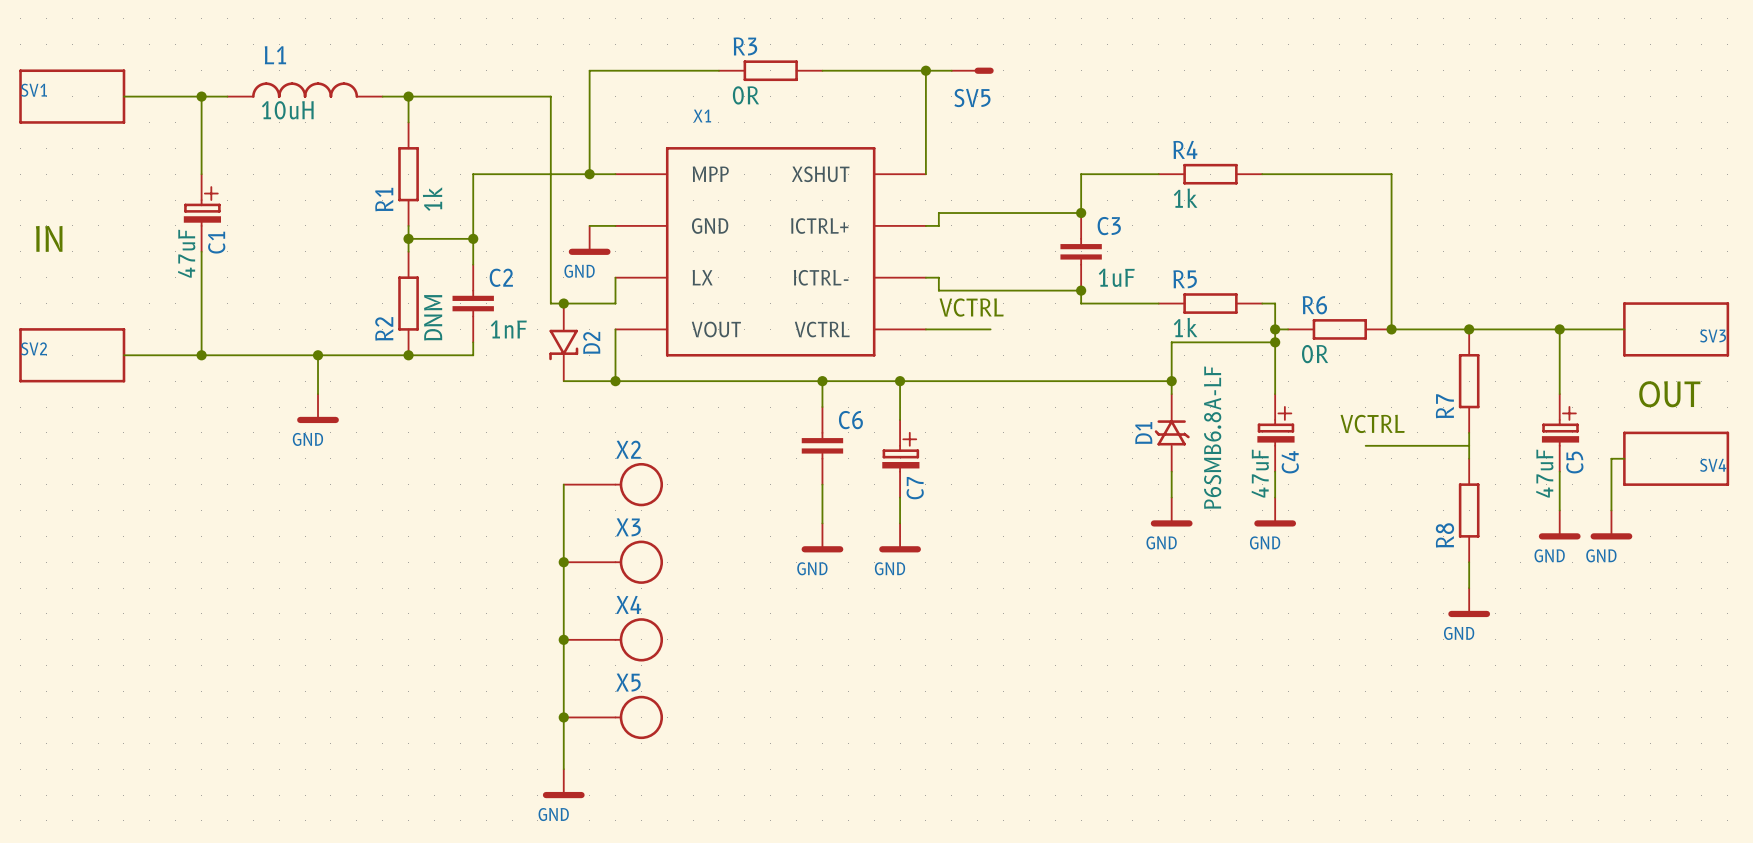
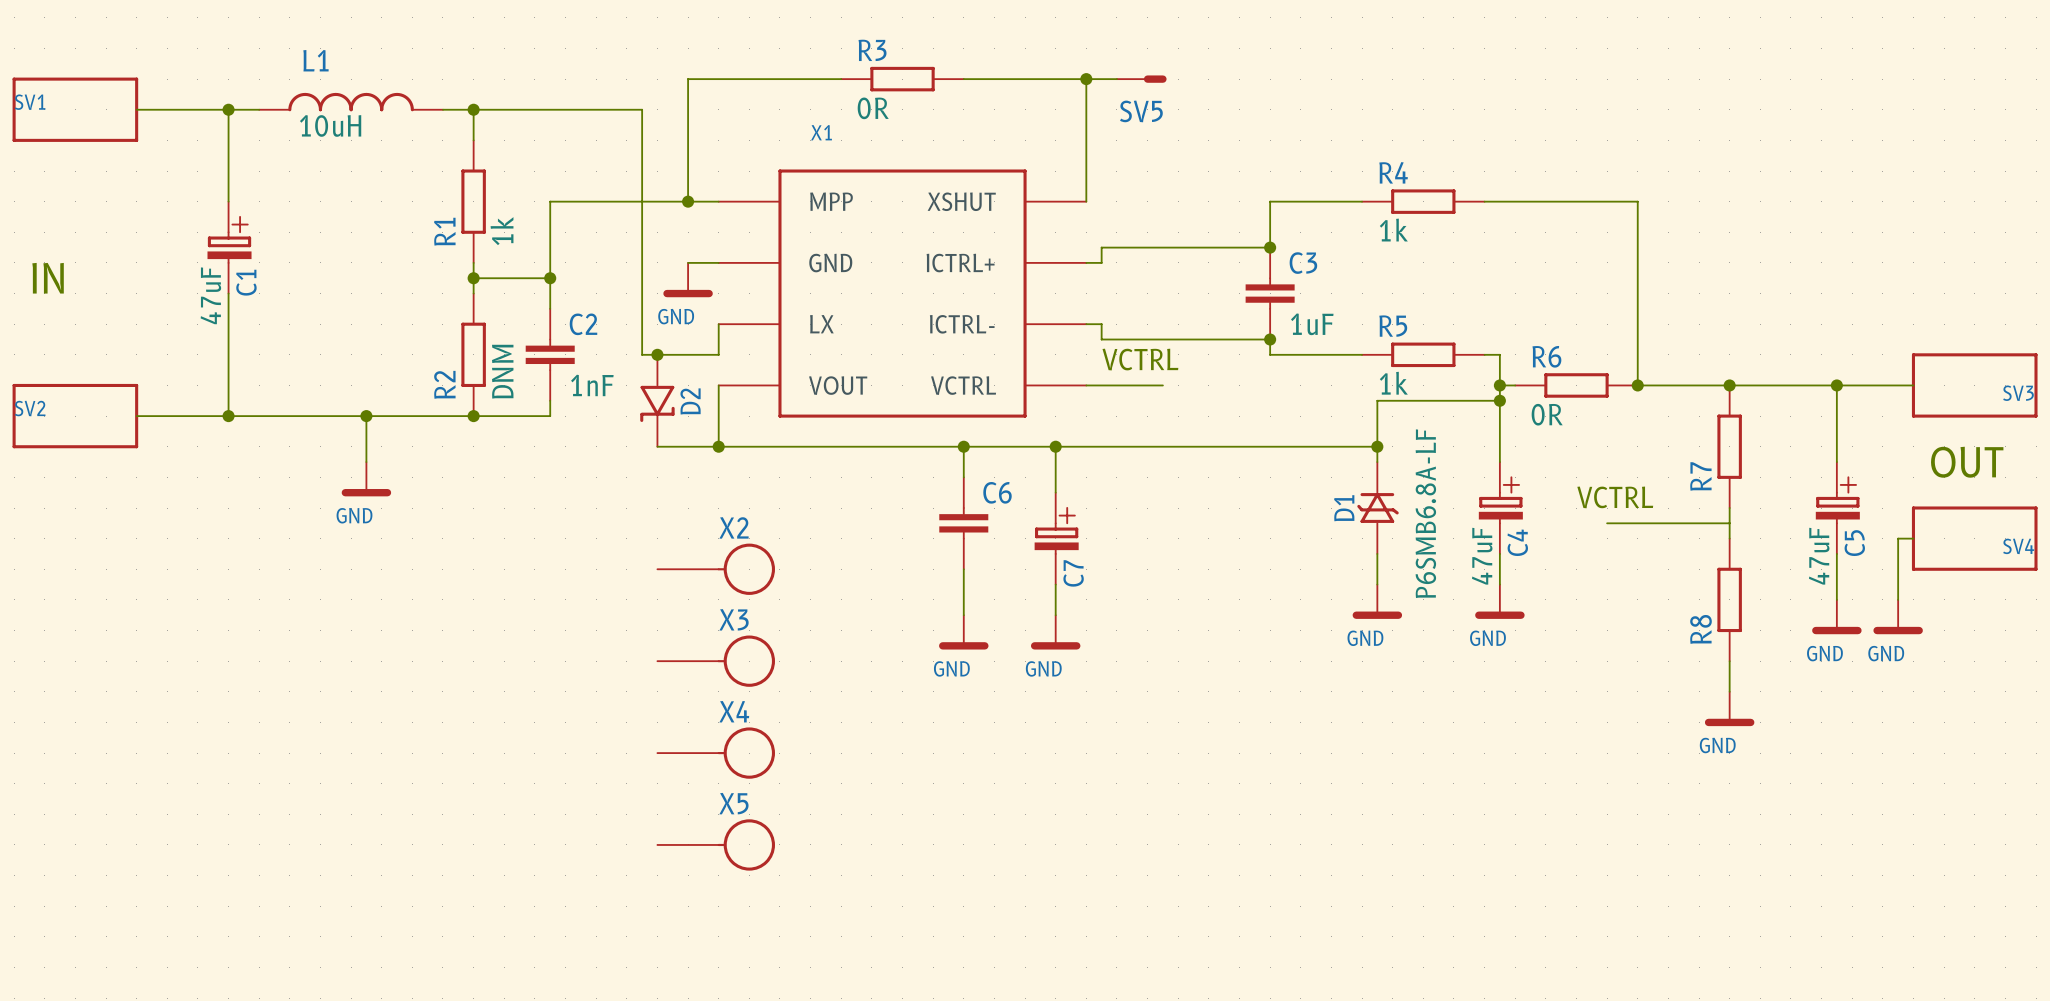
wire: (563, 484) (563, 769) -> none
junction: (563, 562) -> none
junction: (563, 639) -> none
junction: (563, 717) -> none
power symbol: (563, 783) -> none

